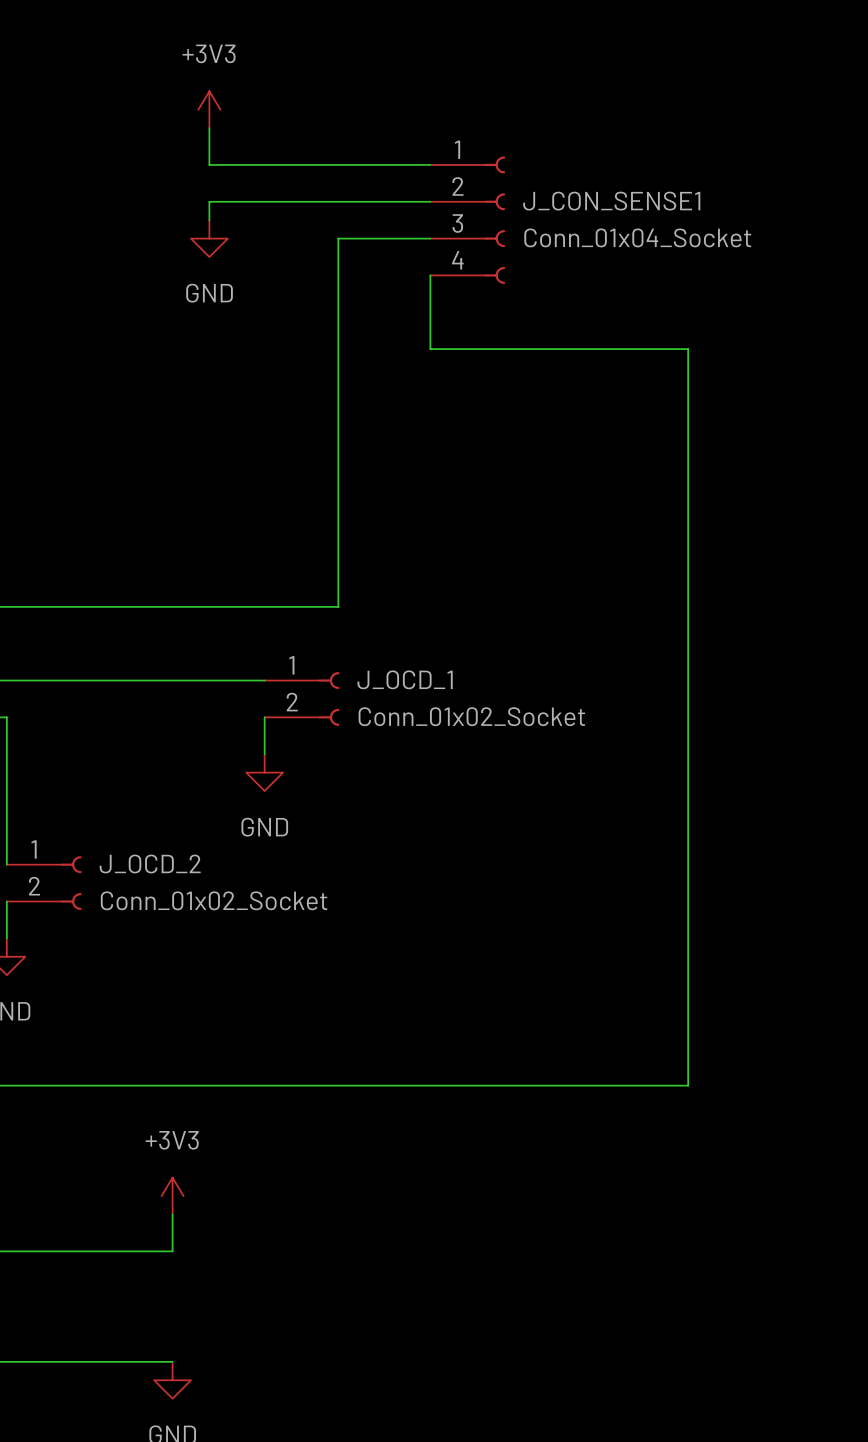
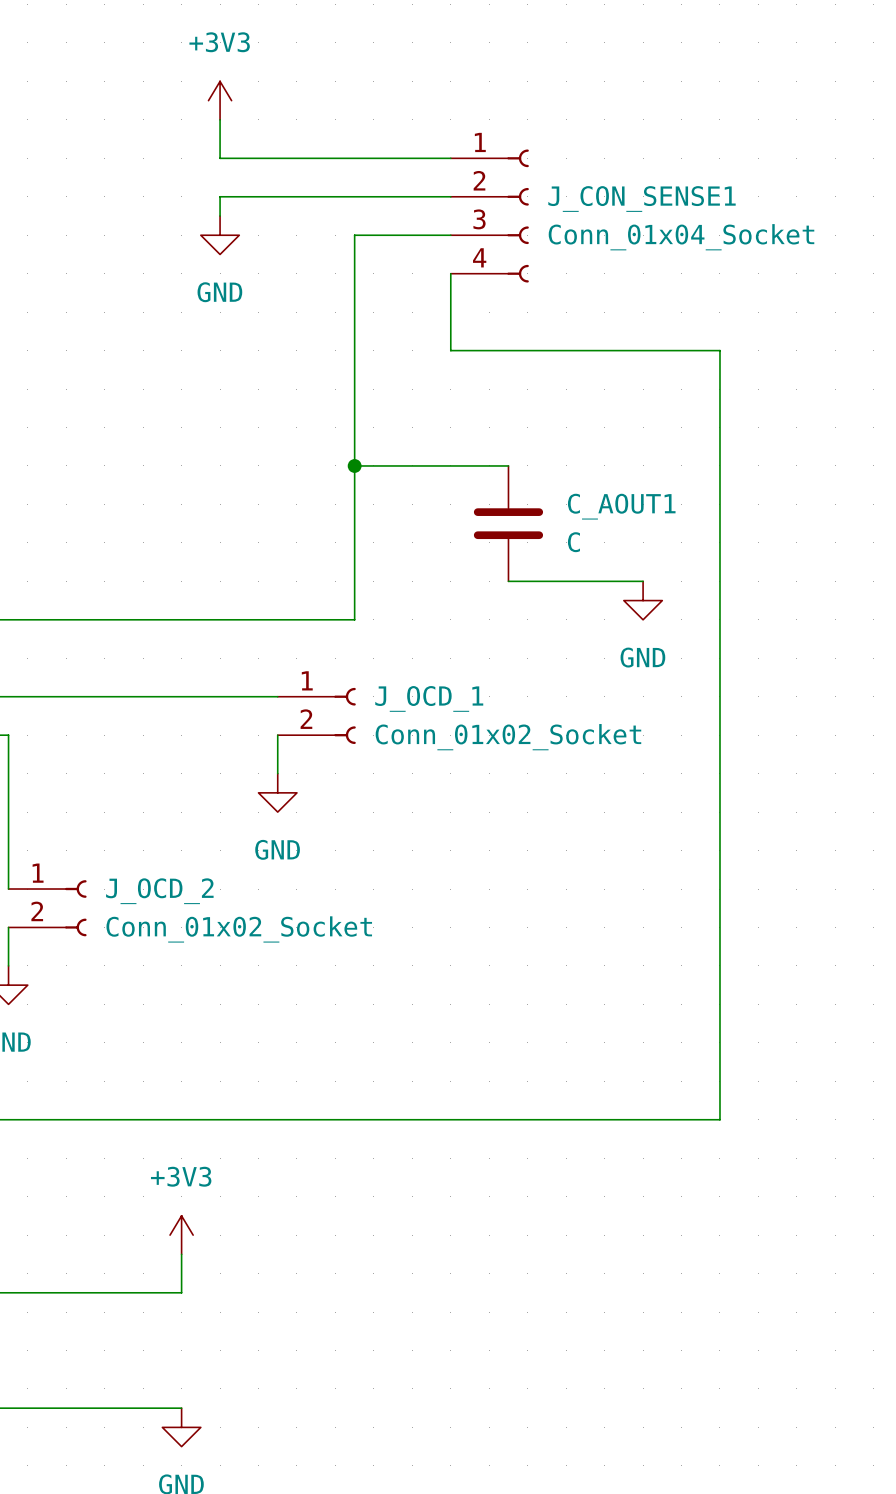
wire: none -> (354, 465) (508, 465)
junction: none -> (354, 465)
C_AOUT1: none -> C (508, 523)
wire: none -> (508, 581) (643, 581)
power symbol: none -> GND (643, 600)

